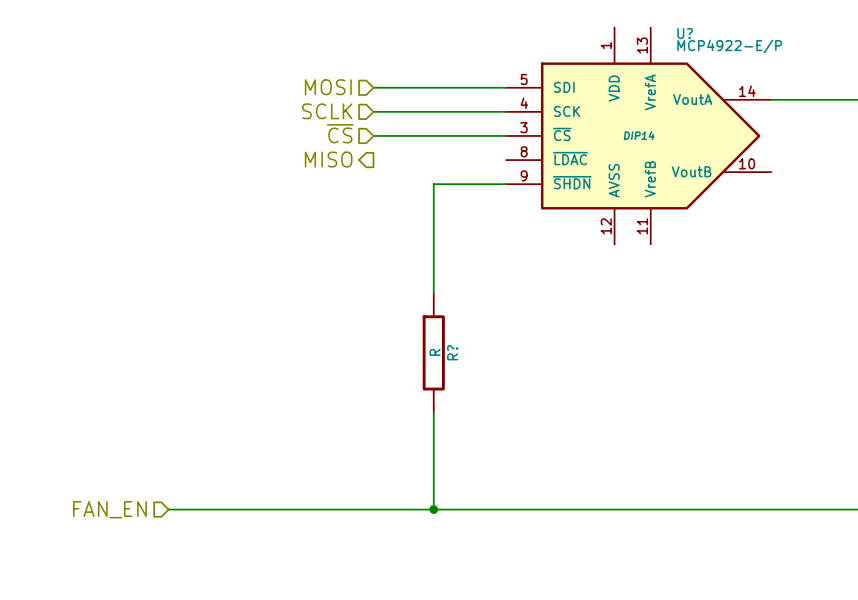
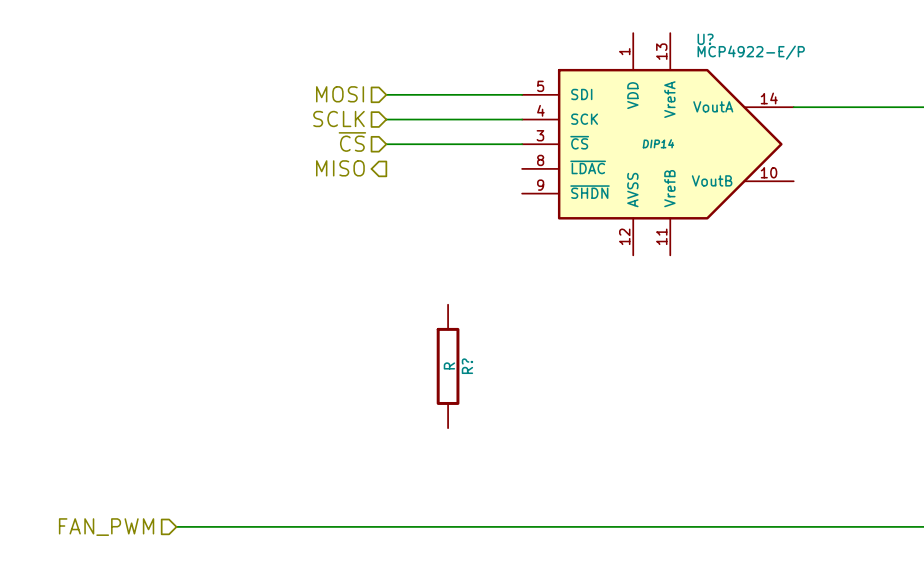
wire: (506, 184) (433, 184) (433, 292) -> none
wire: (433, 413) (433, 509) -> none
hierarchical label: FAN_EN (109, 509) -> FAN_PWM (106, 527)
junction: (433, 509) -> none

